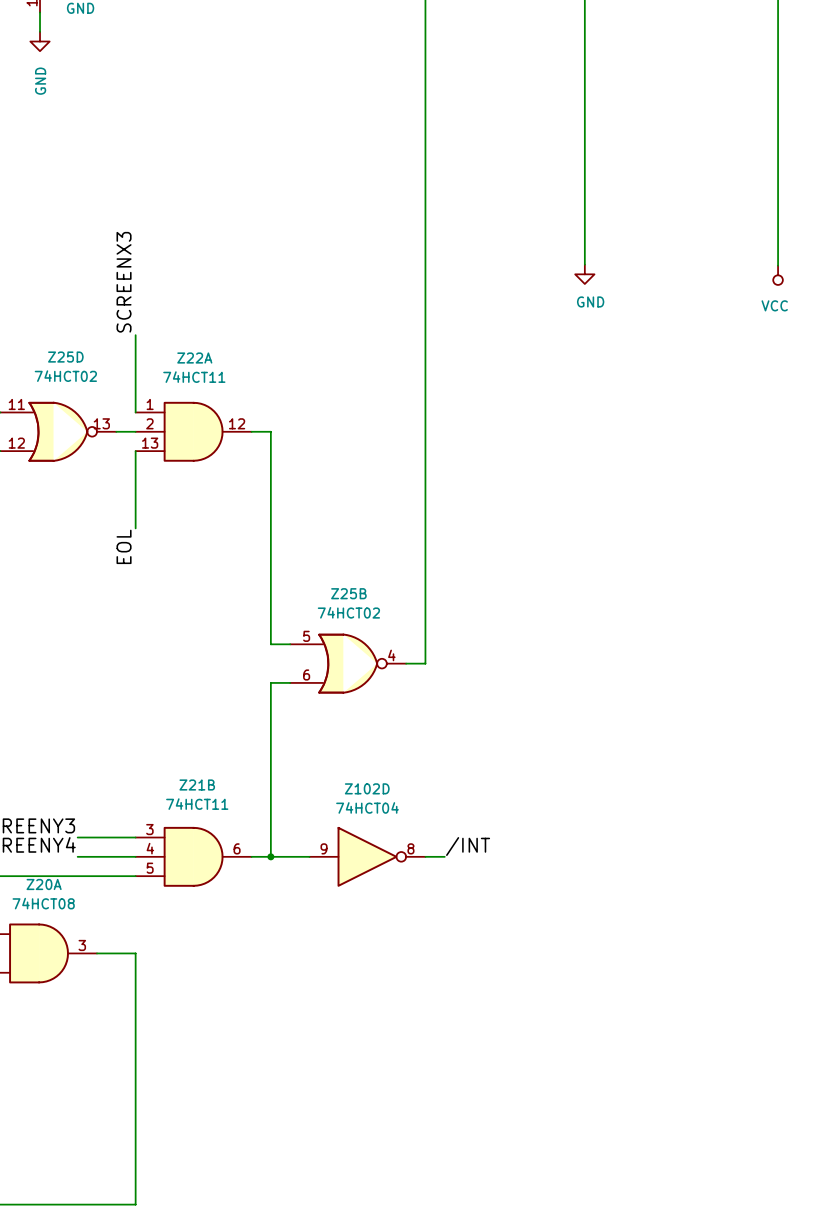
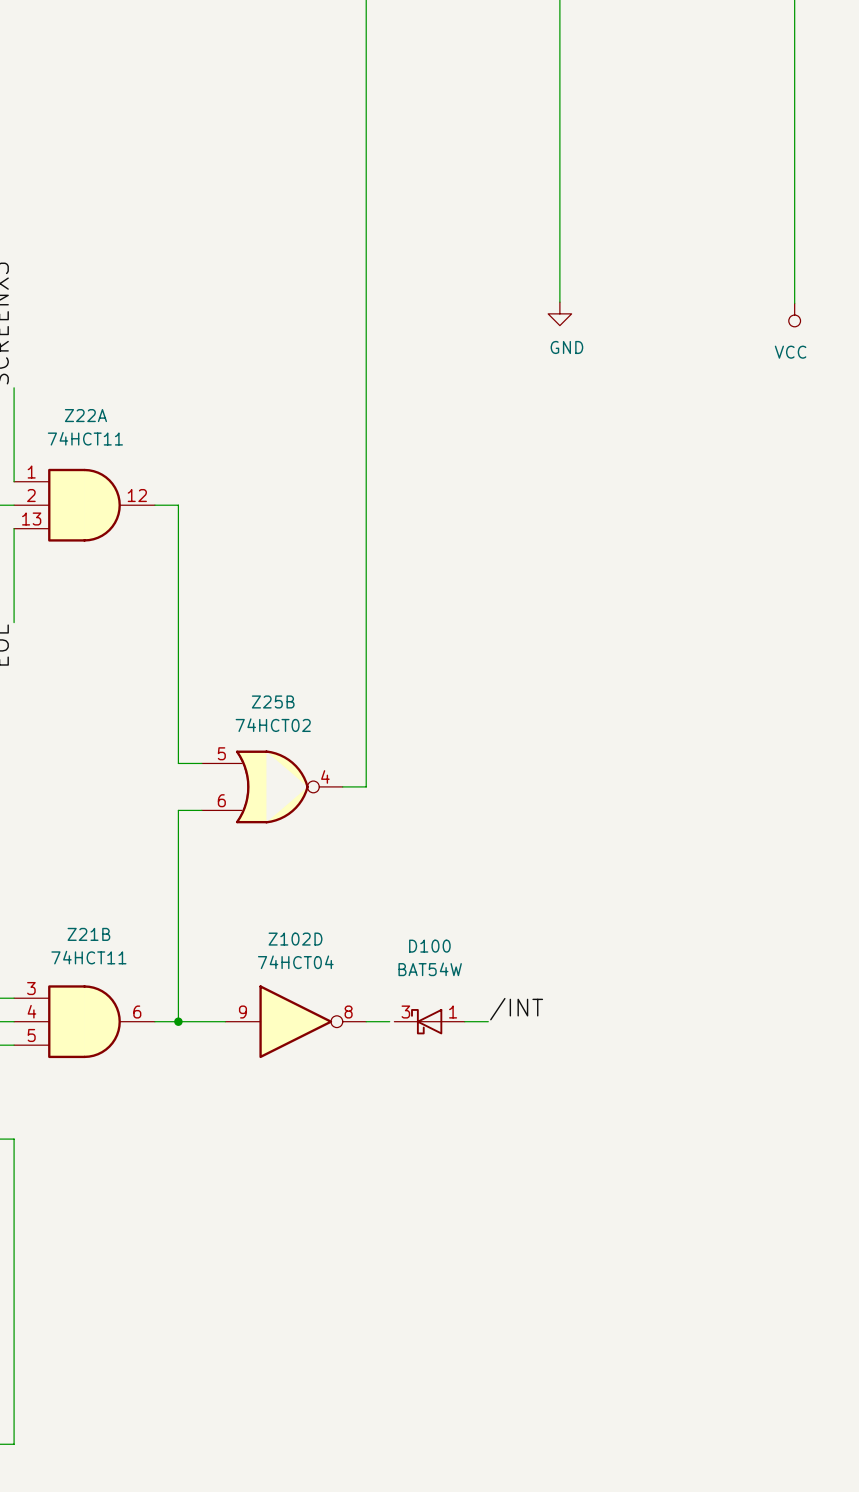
label position: /INT (468, 846) -> /INT (516, 1009)
D100: none -> BAT54W (429, 1021)
wire: none -> (464, 1021) (488, 1021)

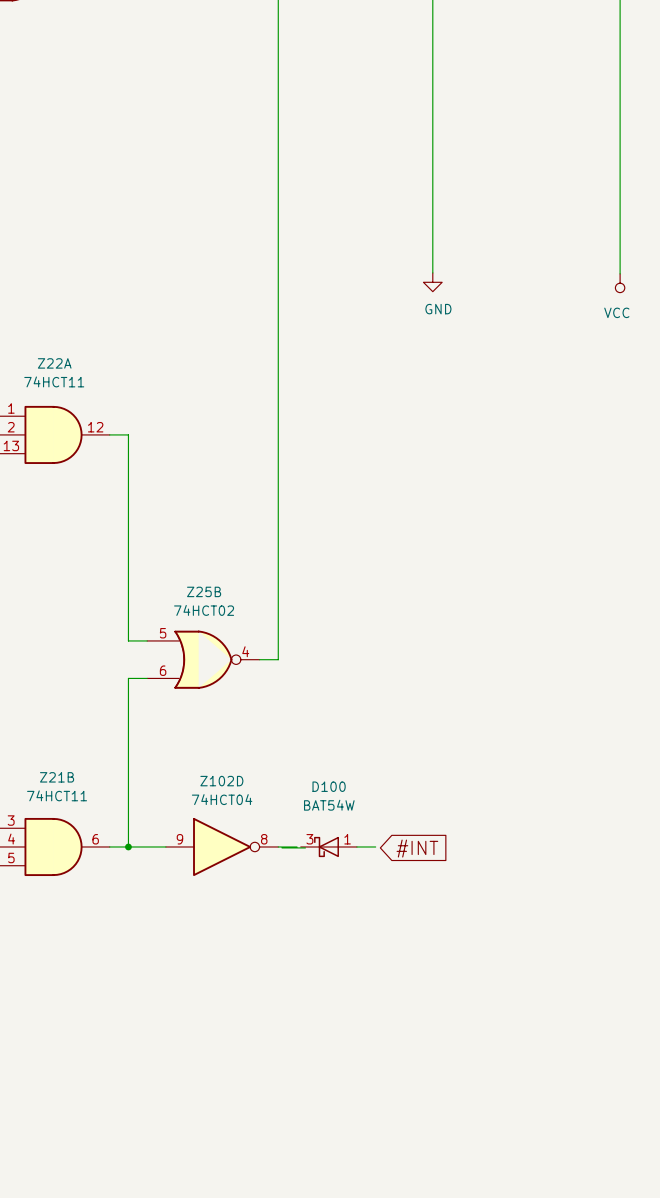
label: /INT (516, 1009) -> none
wire: none -> (282, 847) (305, 847)
global label: none -> #INT (417, 848)

